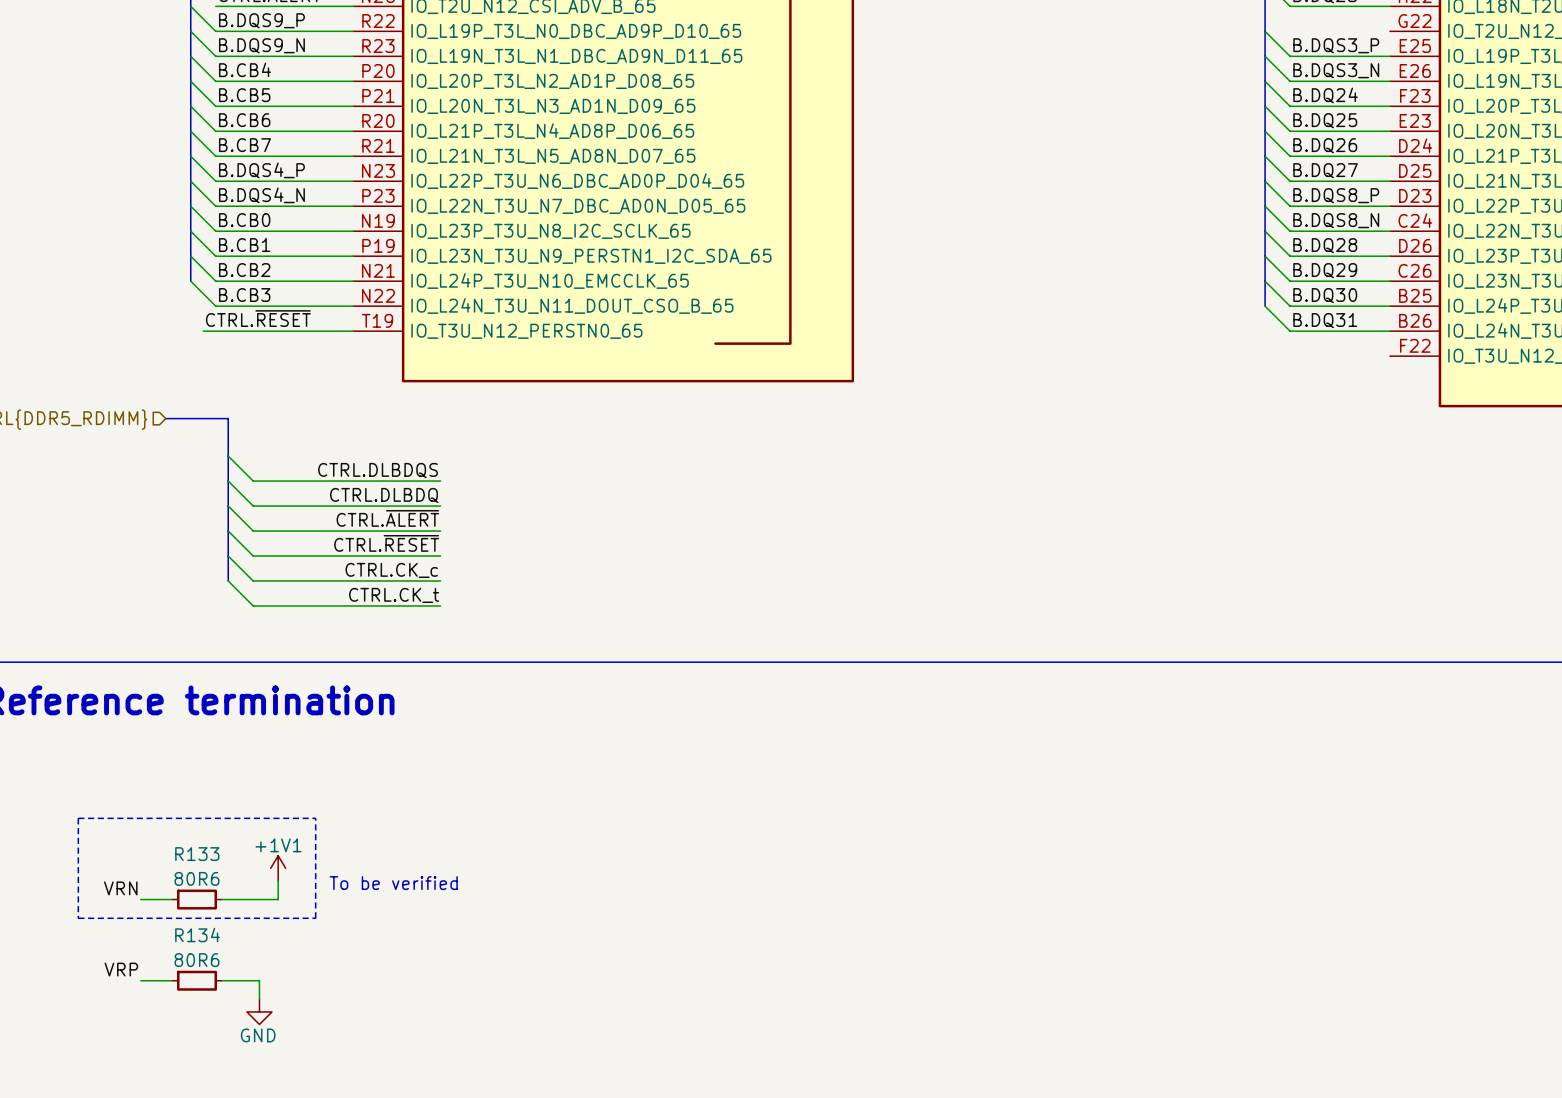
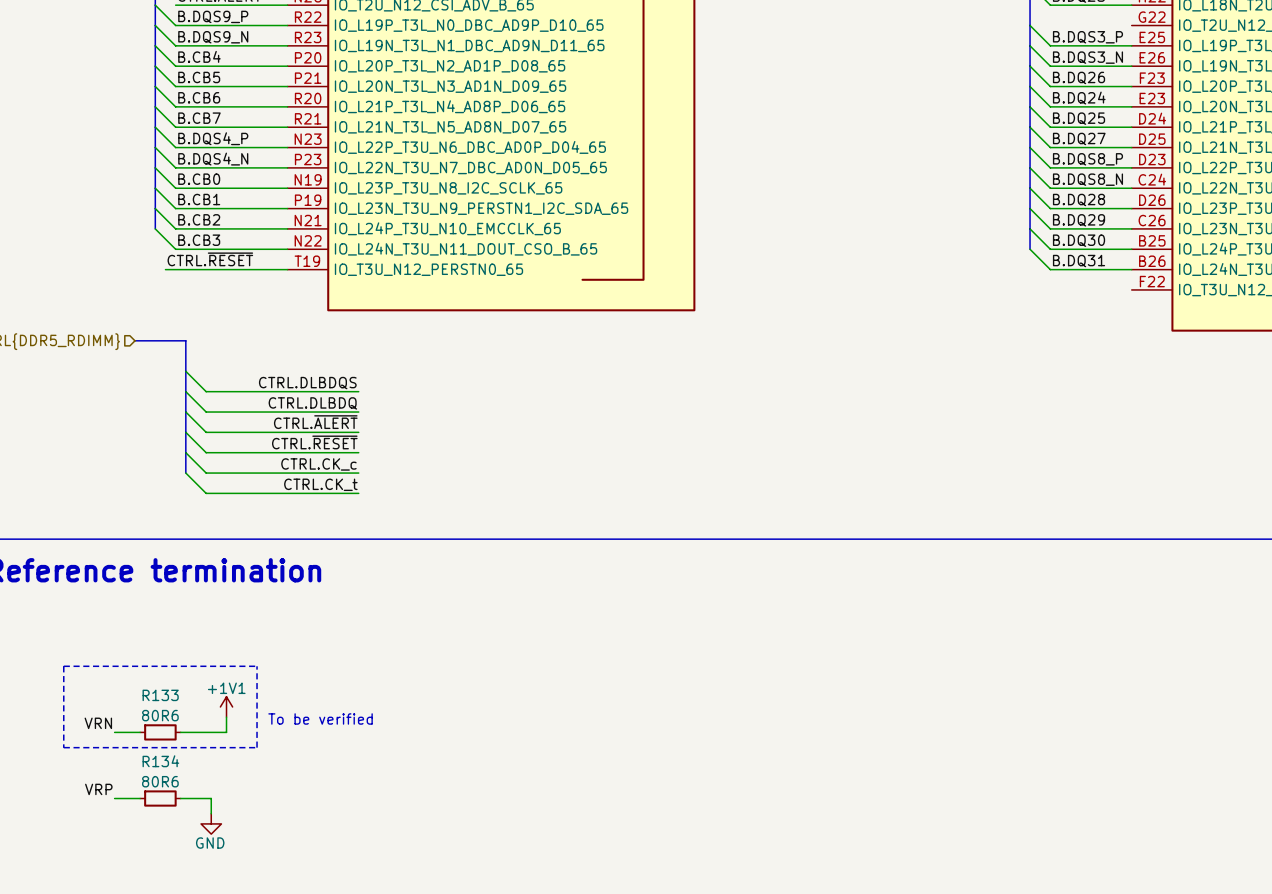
label: B.DQ24 (1325, 95) -> B.DQ26 (1079, 77)
label: B.DQ25 (1325, 120) -> B.DQ24 (1079, 98)
label: B.DQ26 (1325, 145) -> B.DQ25 (1079, 118)

